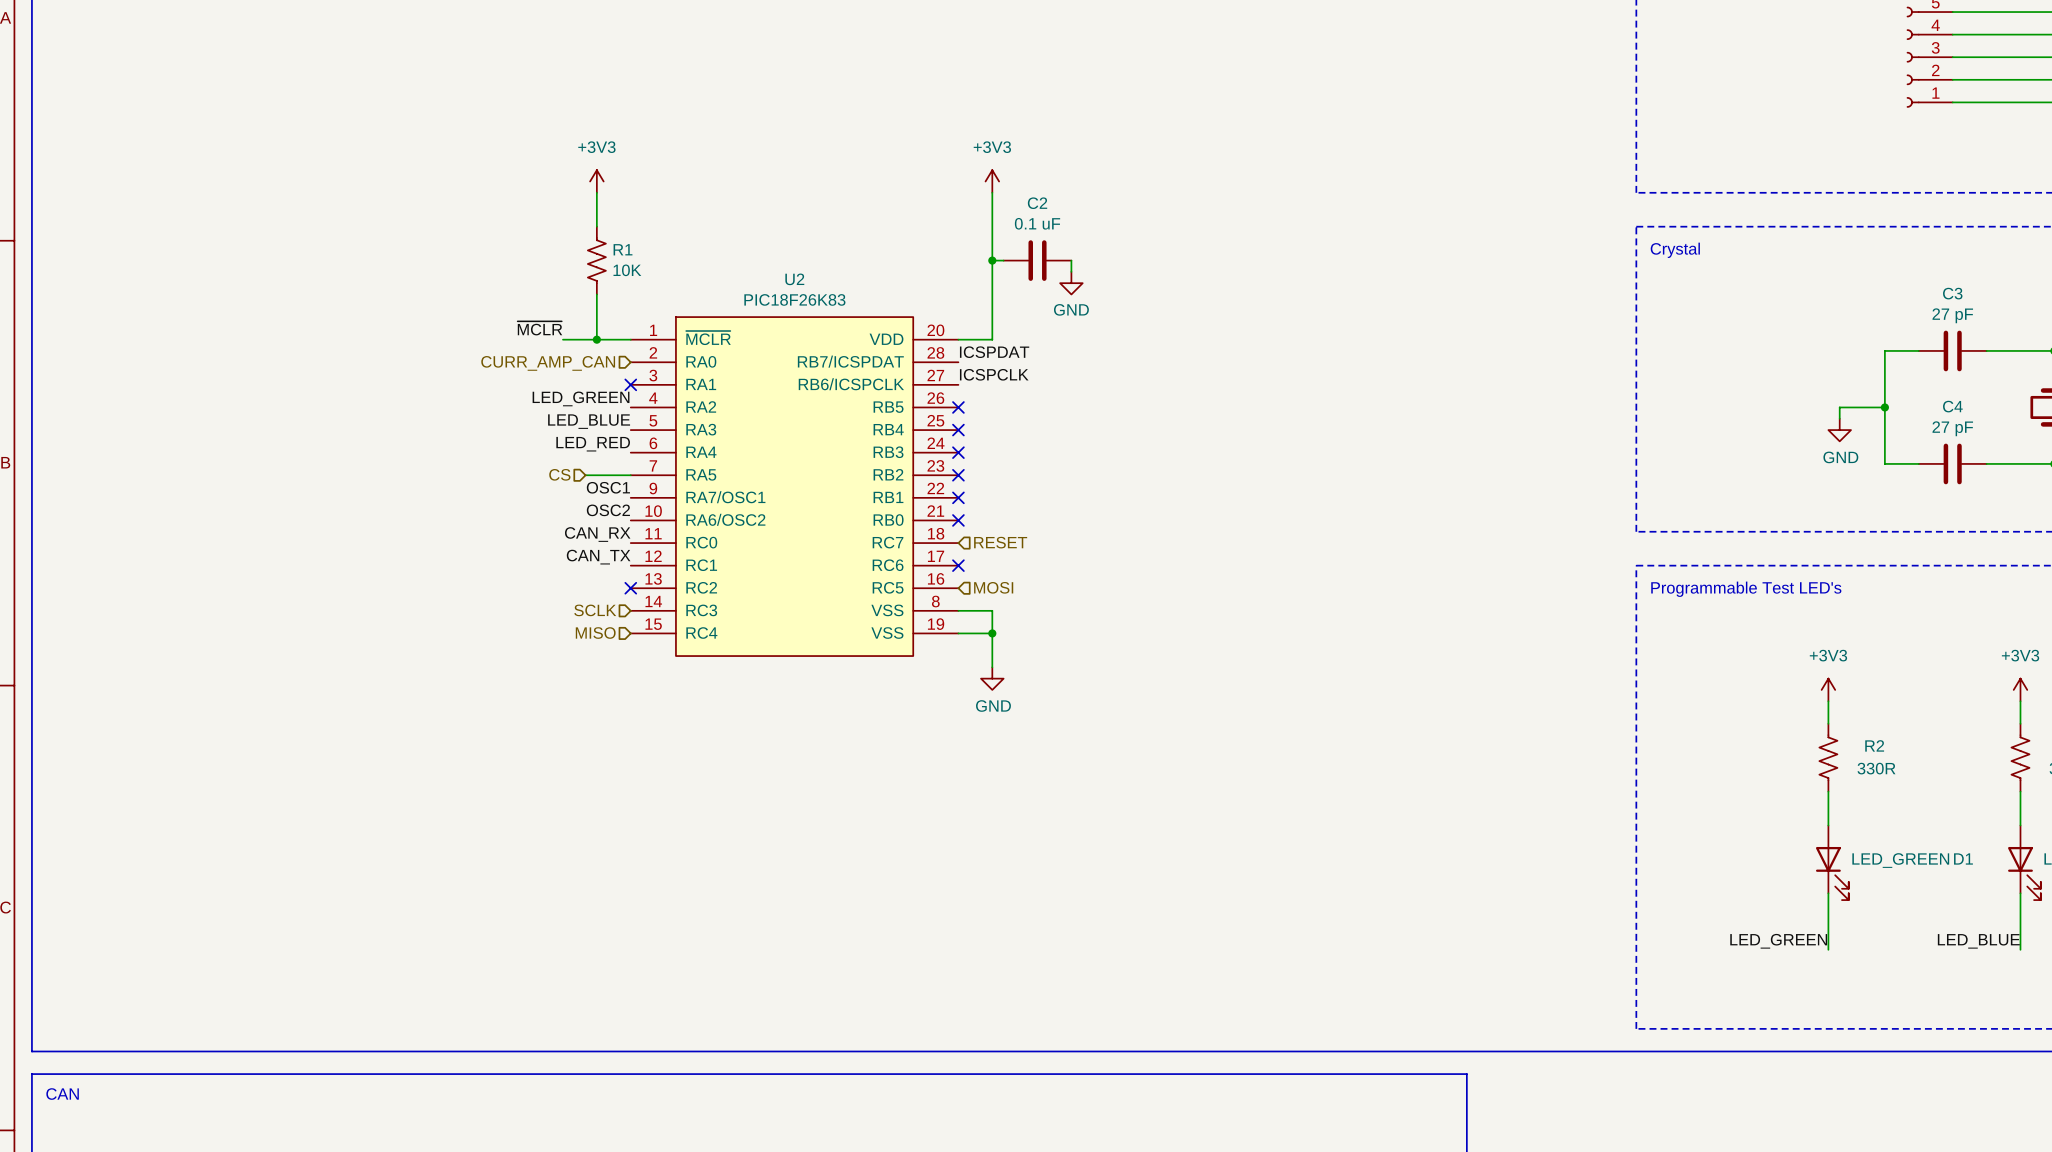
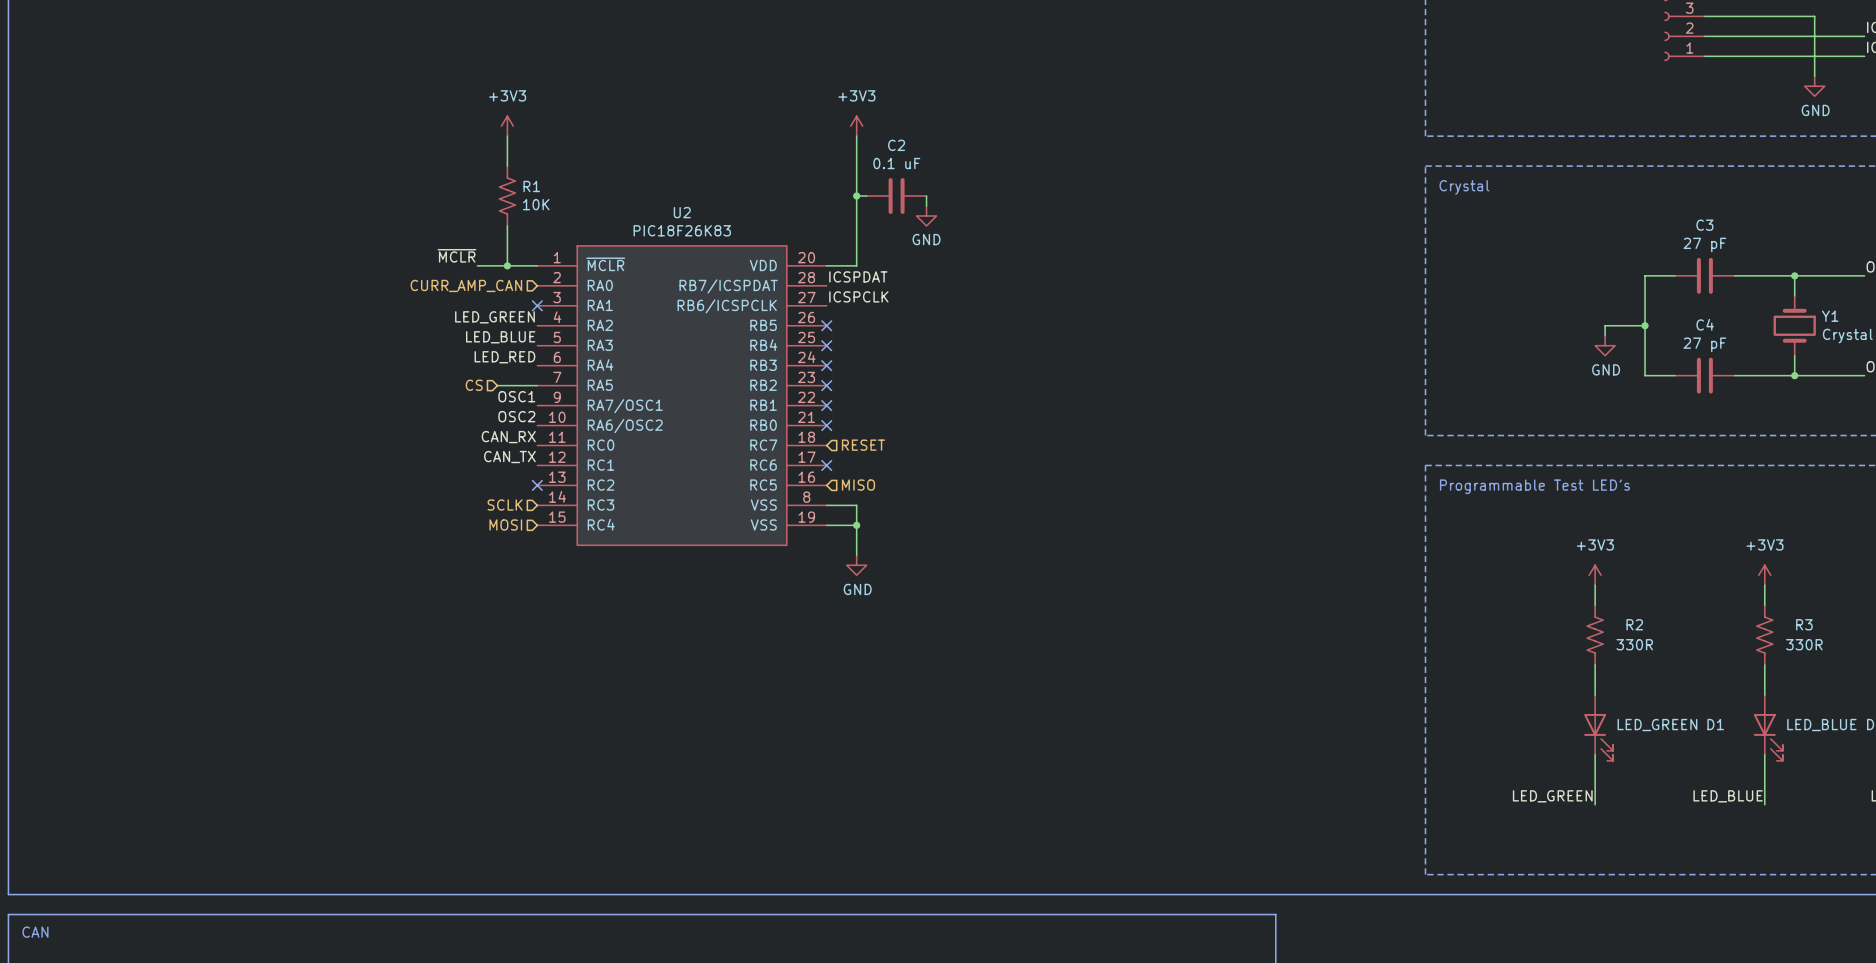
hierarchical label: MOSI (993, 587) -> MISO (858, 485)
hierarchical label: MISO (595, 633) -> MOSI (505, 524)

